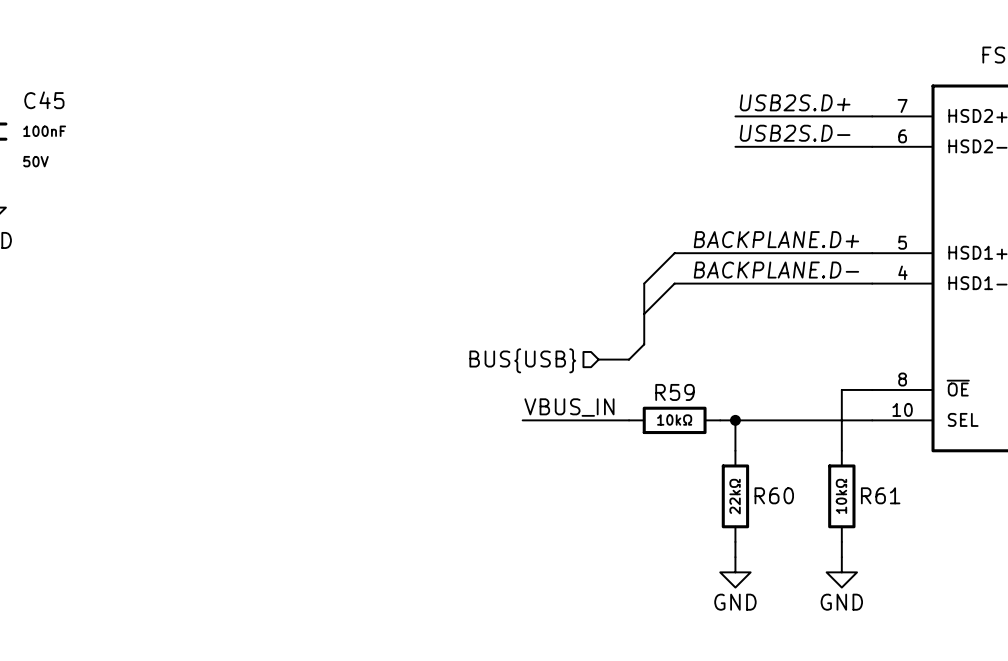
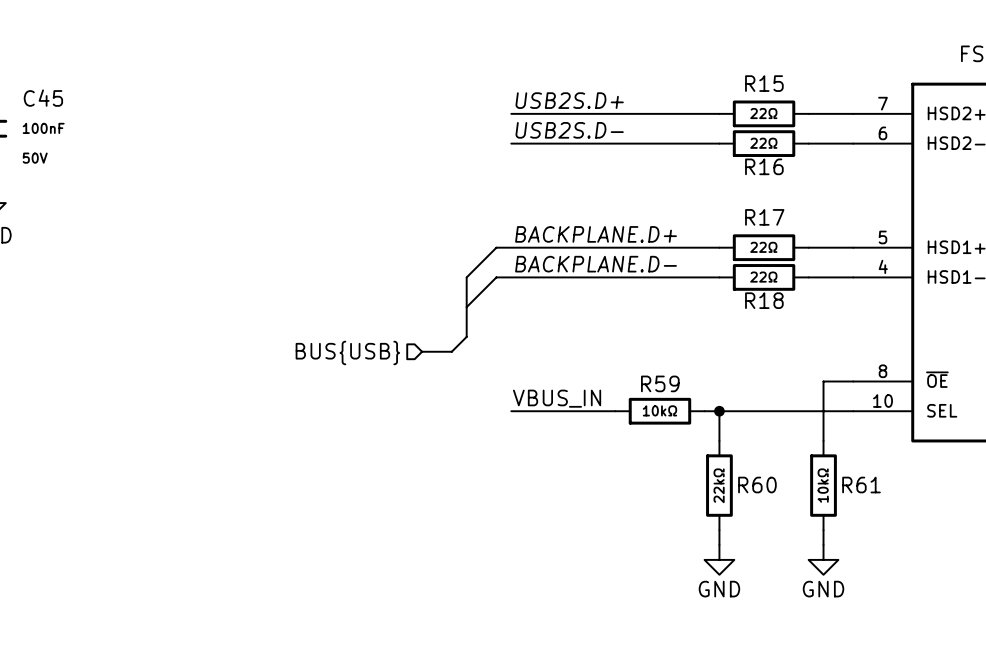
label position: USB2S.D+ (795, 102) -> USB2S.D+ (569, 100)
wire: (735, 116) (826, 116) -> (719, 113) (511, 113)
R15: none -> 22Ω (764, 113)
label position: USB2S.D- (795, 133) -> USB2S.D- (569, 130)
wire: (735, 146) (826, 146) -> (719, 143) (511, 143)
R16: none -> 22Ω (764, 143)
label position: BACKPLANE.D+ (776, 239) -> BACKPLANE.D+ (596, 234)
wire: (674, 253) (644, 283) -> (659, 247) (496, 247) (466, 277)
wire: (735, 253) (826, 253) -> none
R17: none -> 22Ω (764, 247)
label position: BACKPLANE.D- (776, 270) -> BACKPLANE.D- (596, 264)
bus: (644, 283) (644, 344) (629, 359) (598, 359) -> (466, 277) (466, 336) (451, 351) (422, 351)
wire: (674, 283) (644, 313) -> (659, 277) (496, 277) (466, 307)
wire: (735, 283) (826, 283) -> none
R18: none -> 22Ω (764, 277)
hierarchical label position: BUS{USB} (522, 360) -> BUS{USB} (347, 352)

